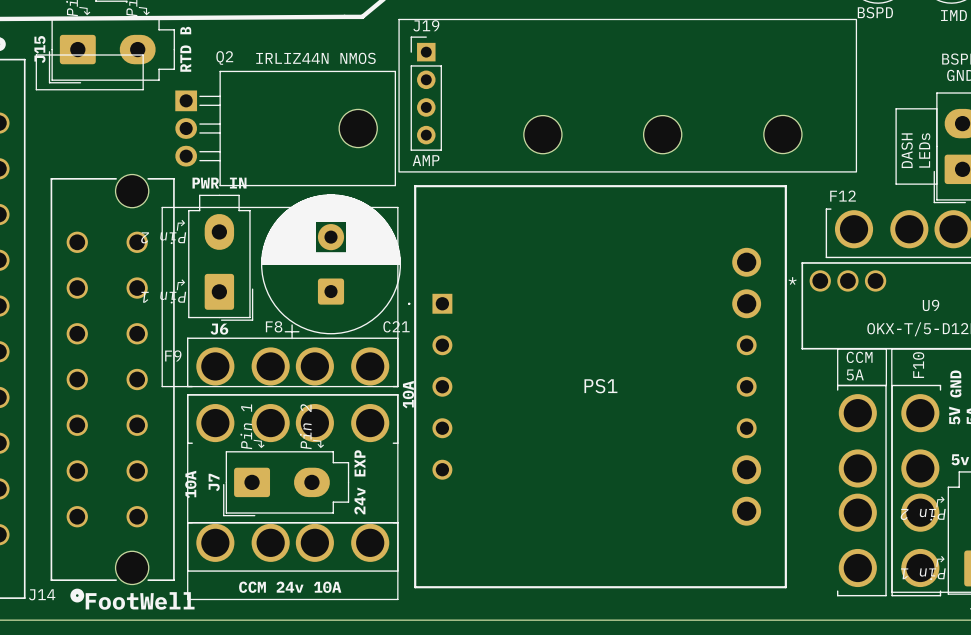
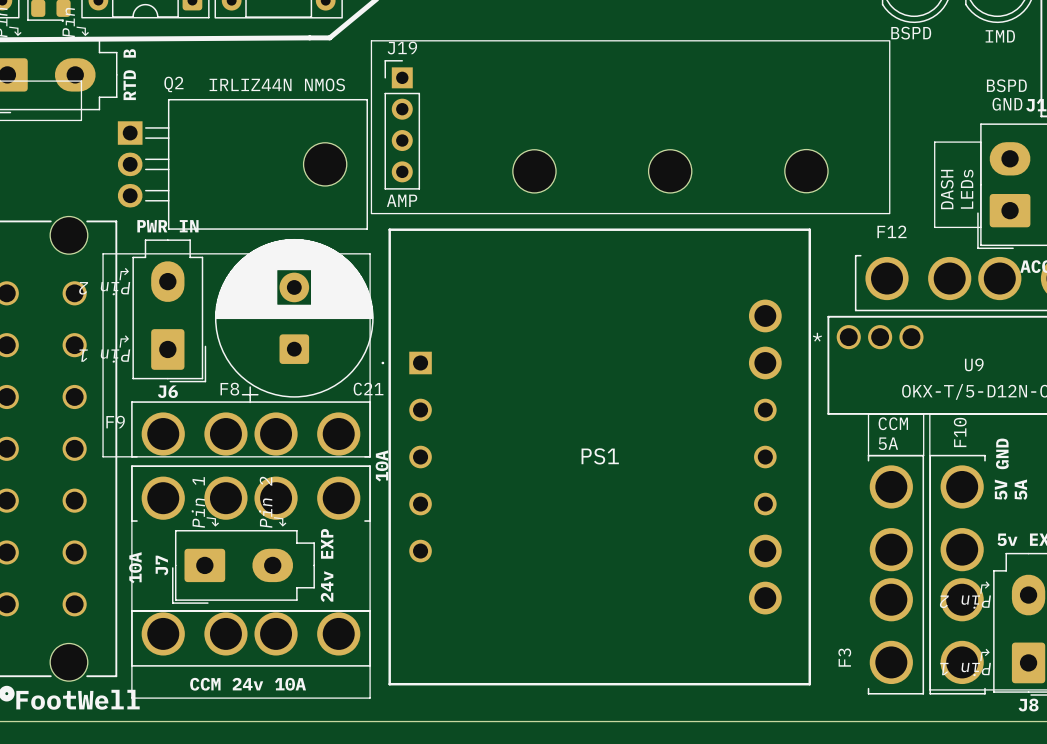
F12 name position: F12 (843, 196) -> F12 (892, 231)
F3 name: none -> F3 (844, 657)

